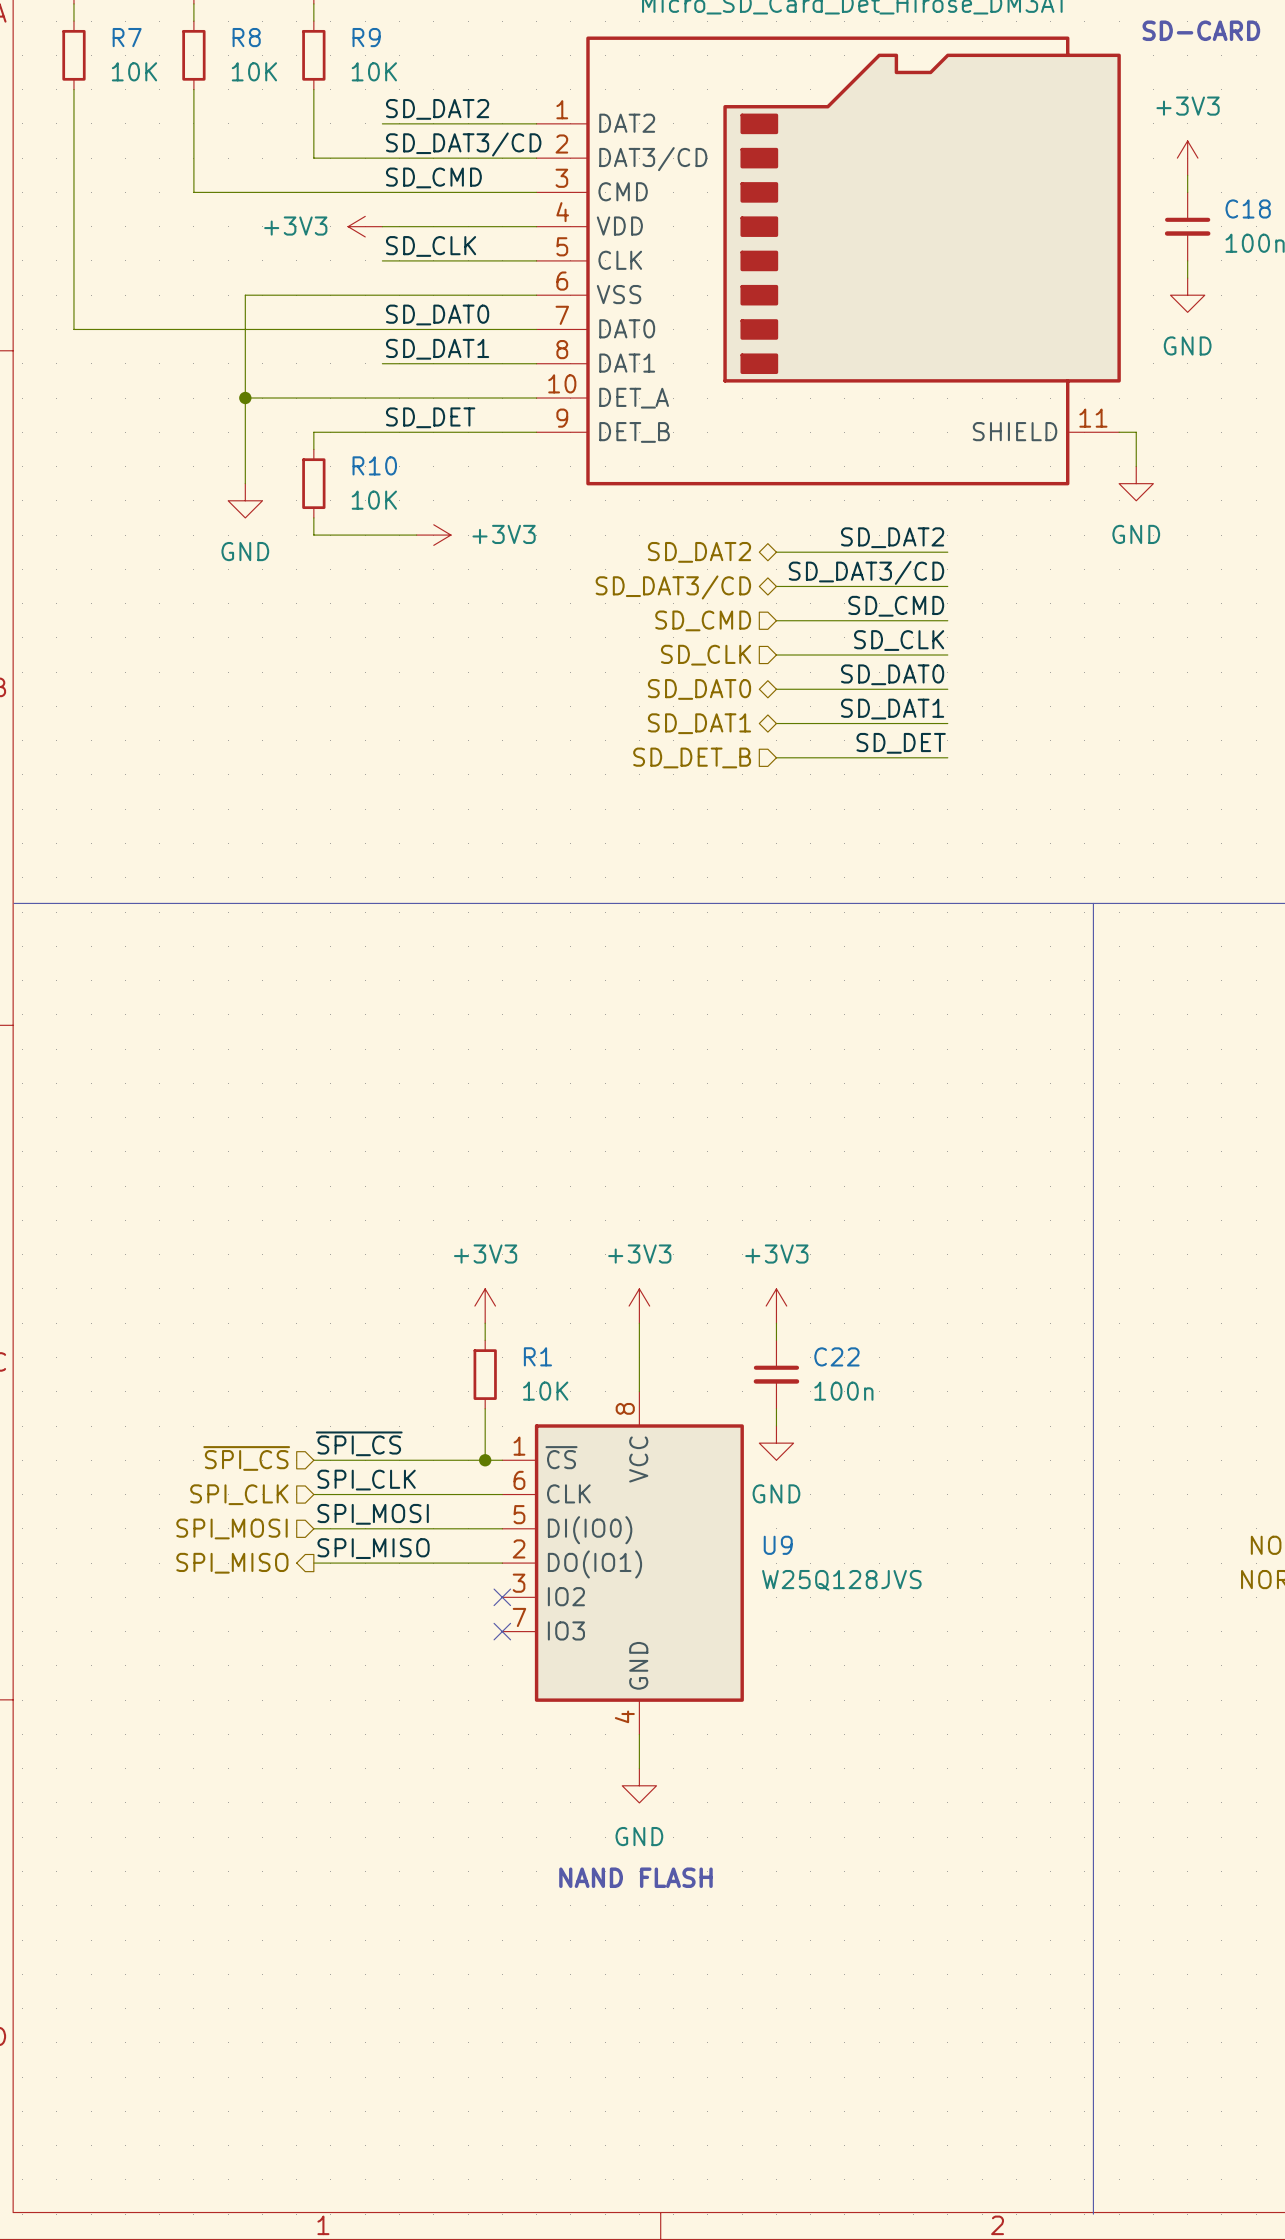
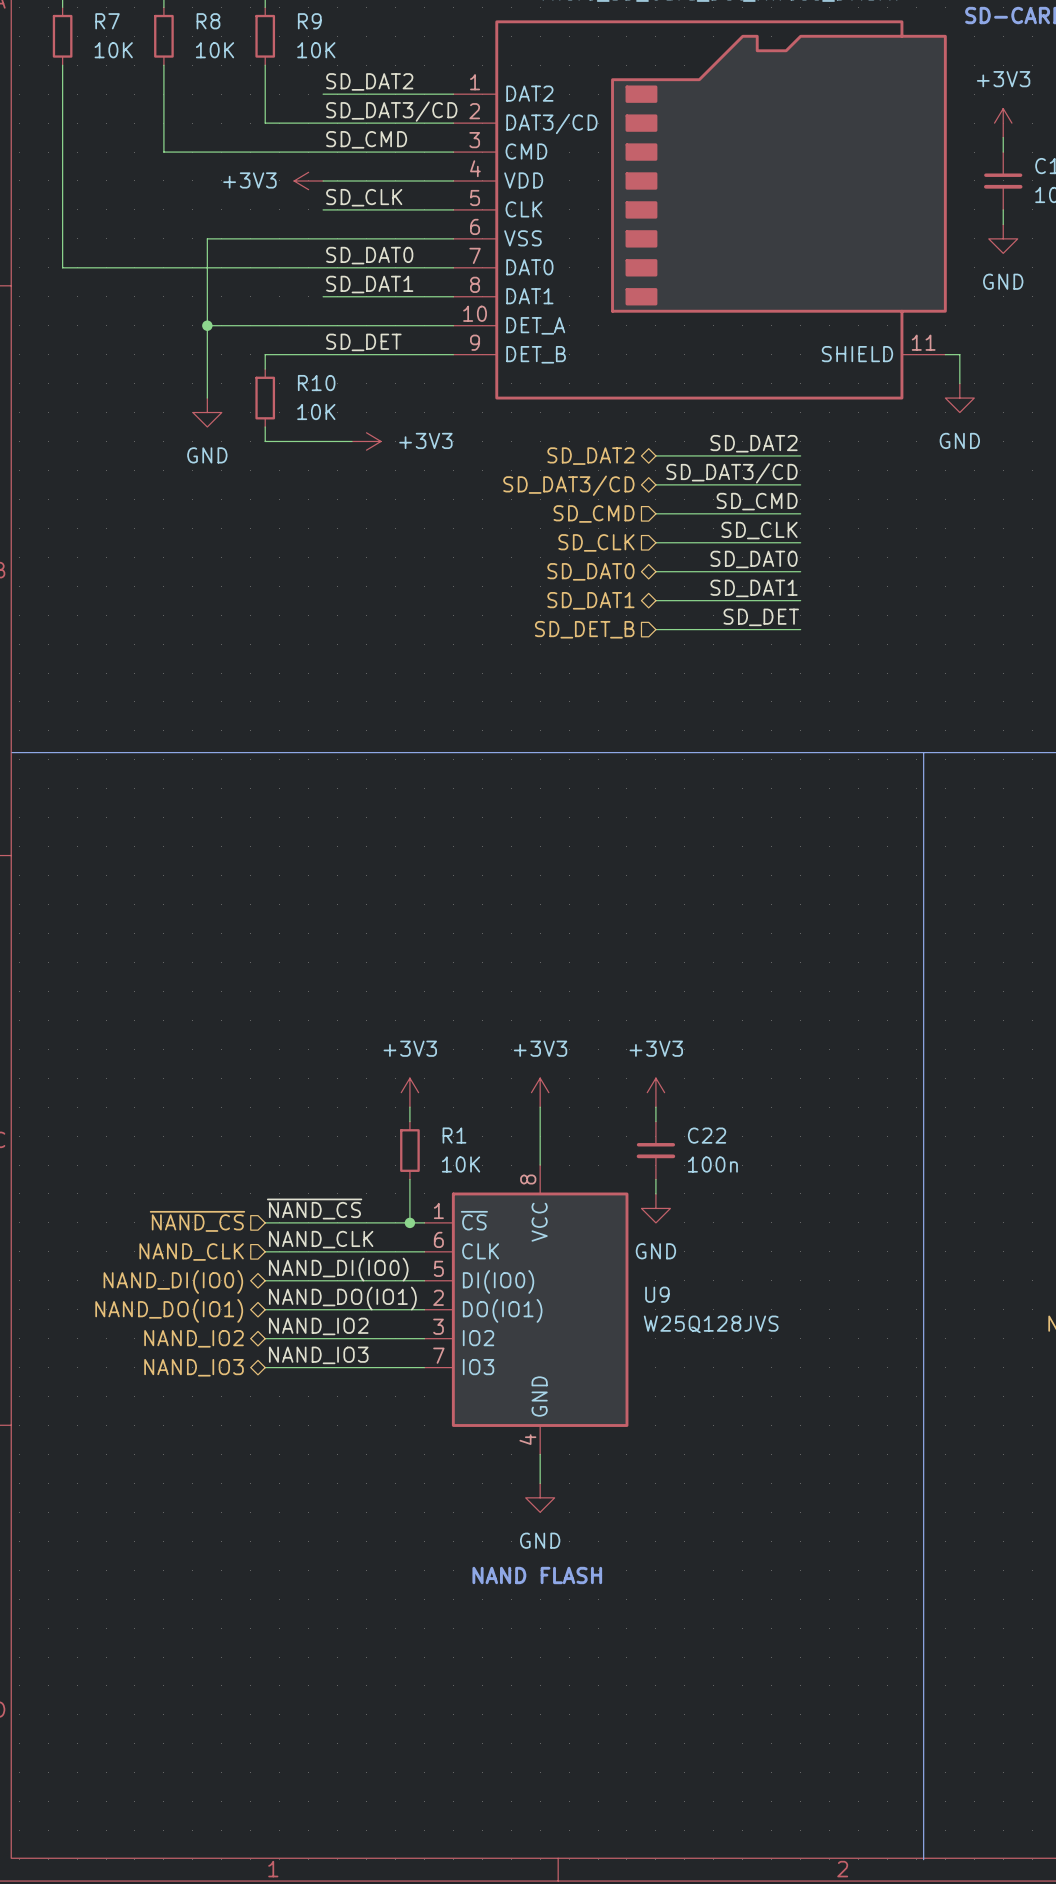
label: ~{SPI_CS} (359, 1443) -> ~{NAND_CS} (314, 1209)
hierarchical label: ~{SPI_CS} (246, 1458) -> ~{NAND_CS} (197, 1221)
label: SPI_CLK (366, 1480) -> NAND_CLK (321, 1239)
hierarchical label: SPI_CLK (239, 1494) -> NAND_CLK (191, 1251)
label: SPI_MOSI (373, 1514) -> NAND_DI(IO0) (338, 1269)
hierarchical label shape: input (231, 1528) -> bidirectional (173, 1281)
hierarchical label: SPI_MOSI (231, 1528) -> NAND_DI(IO0) (173, 1281)
label: SPI_MISO (373, 1548) -> NAND_DO(IO1) (342, 1298)
hierarchical label shape: output (232, 1563) -> bidirectional (169, 1310)
hierarchical label: SPI_MISO (232, 1563) -> NAND_DO(IO1) (169, 1310)
label: none -> NAND_IO2 (318, 1326)
hierarchical label: none -> NAND_IO2 (194, 1338)
wire: none -> (265, 1338) (424, 1338)
no-connect mark: (502, 1597) -> none
label: none -> NAND_IO3 (318, 1355)
hierarchical label: none -> NAND_IO3 (194, 1367)
wire: none -> (265, 1367) (424, 1367)
no-connect mark: (502, 1631) -> none

